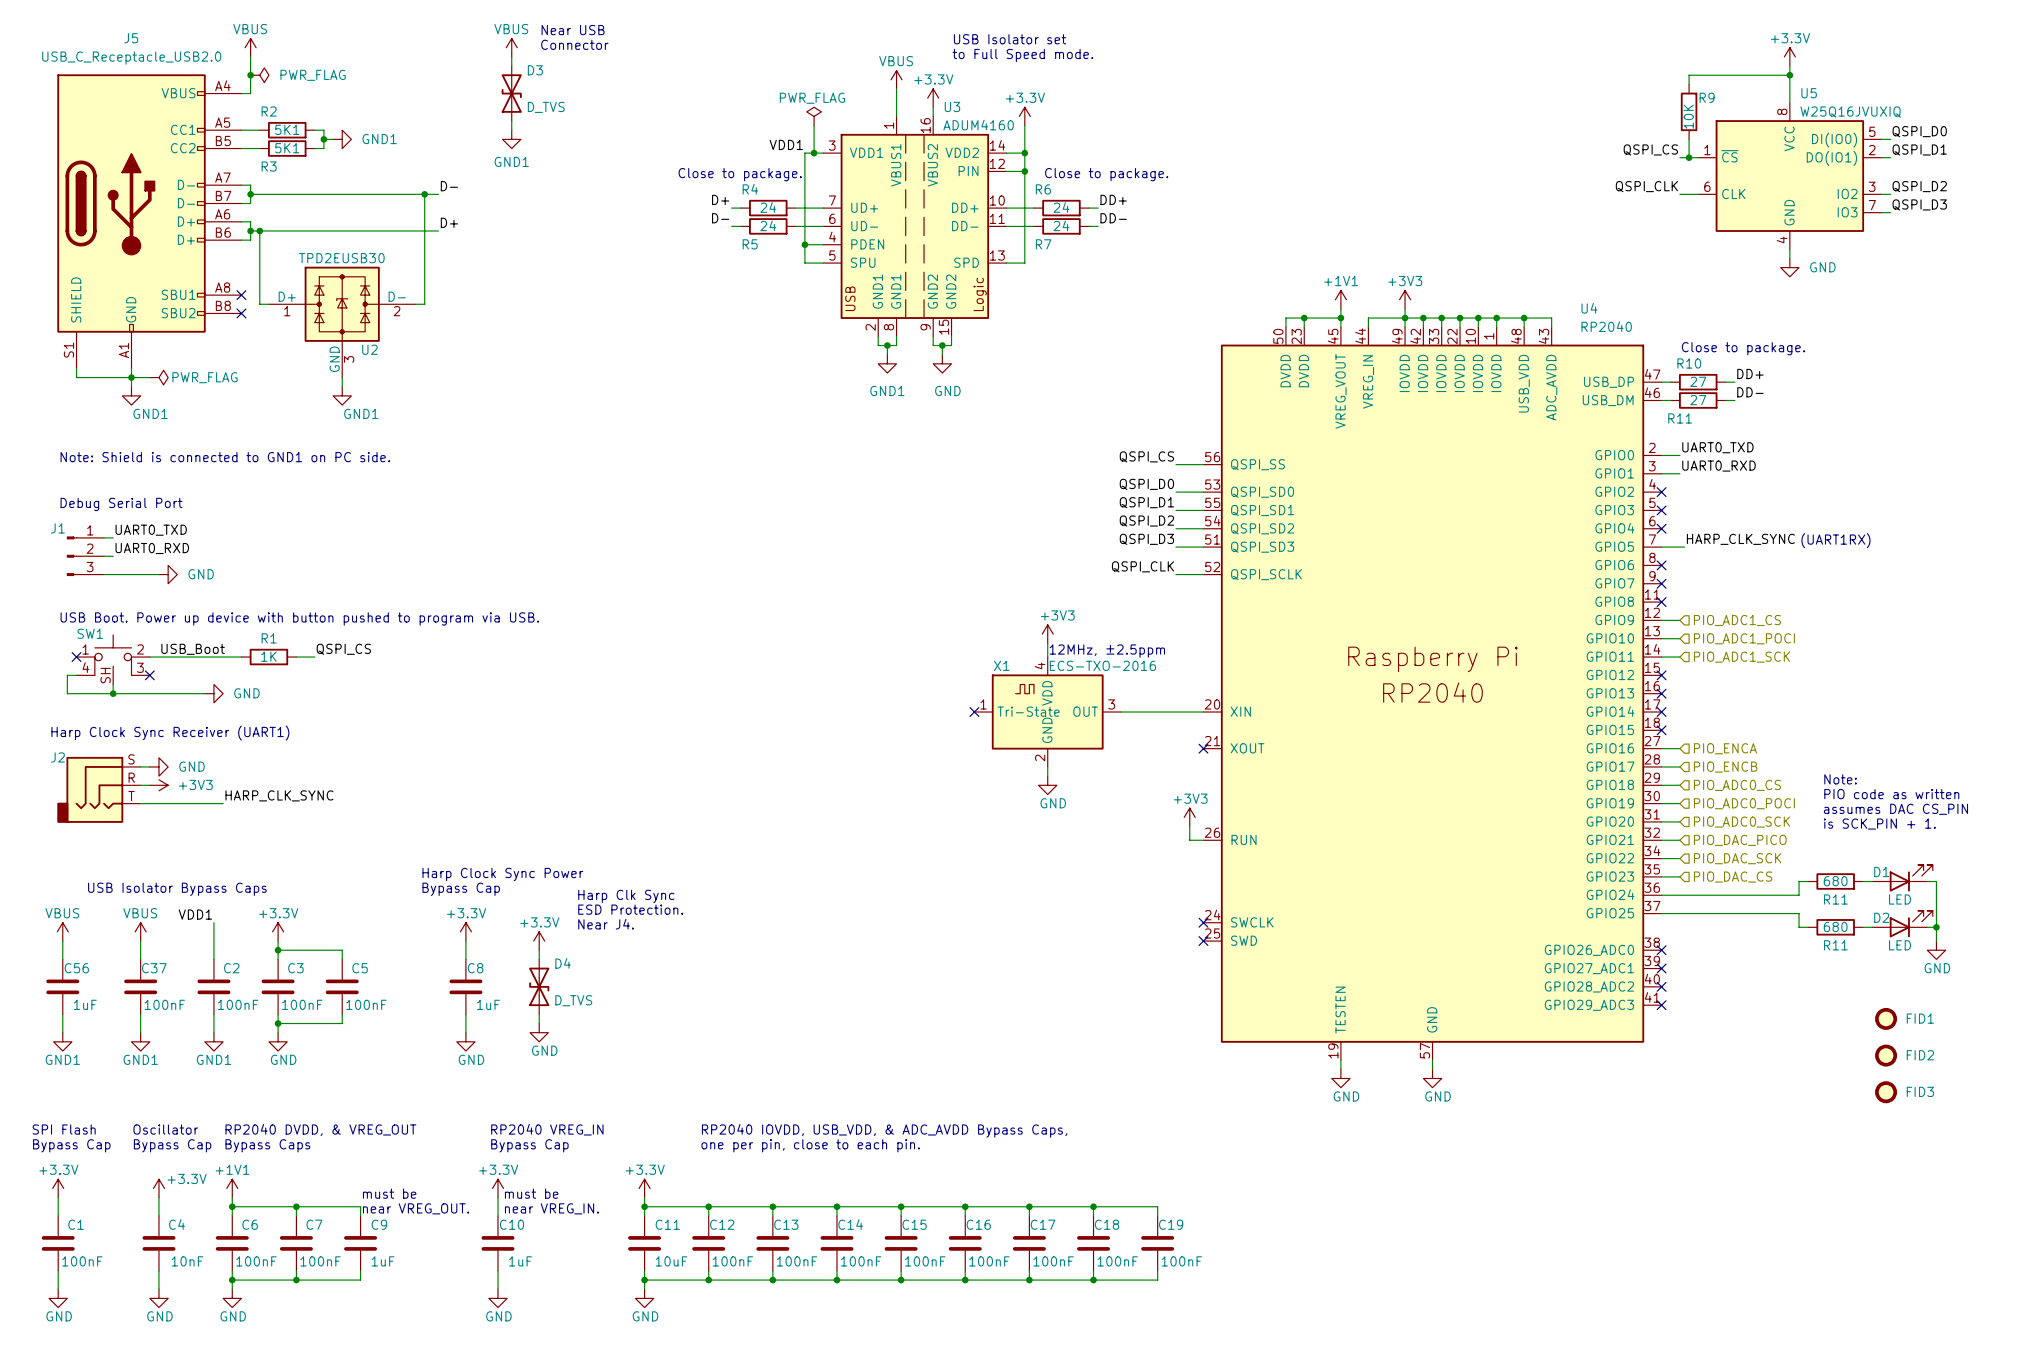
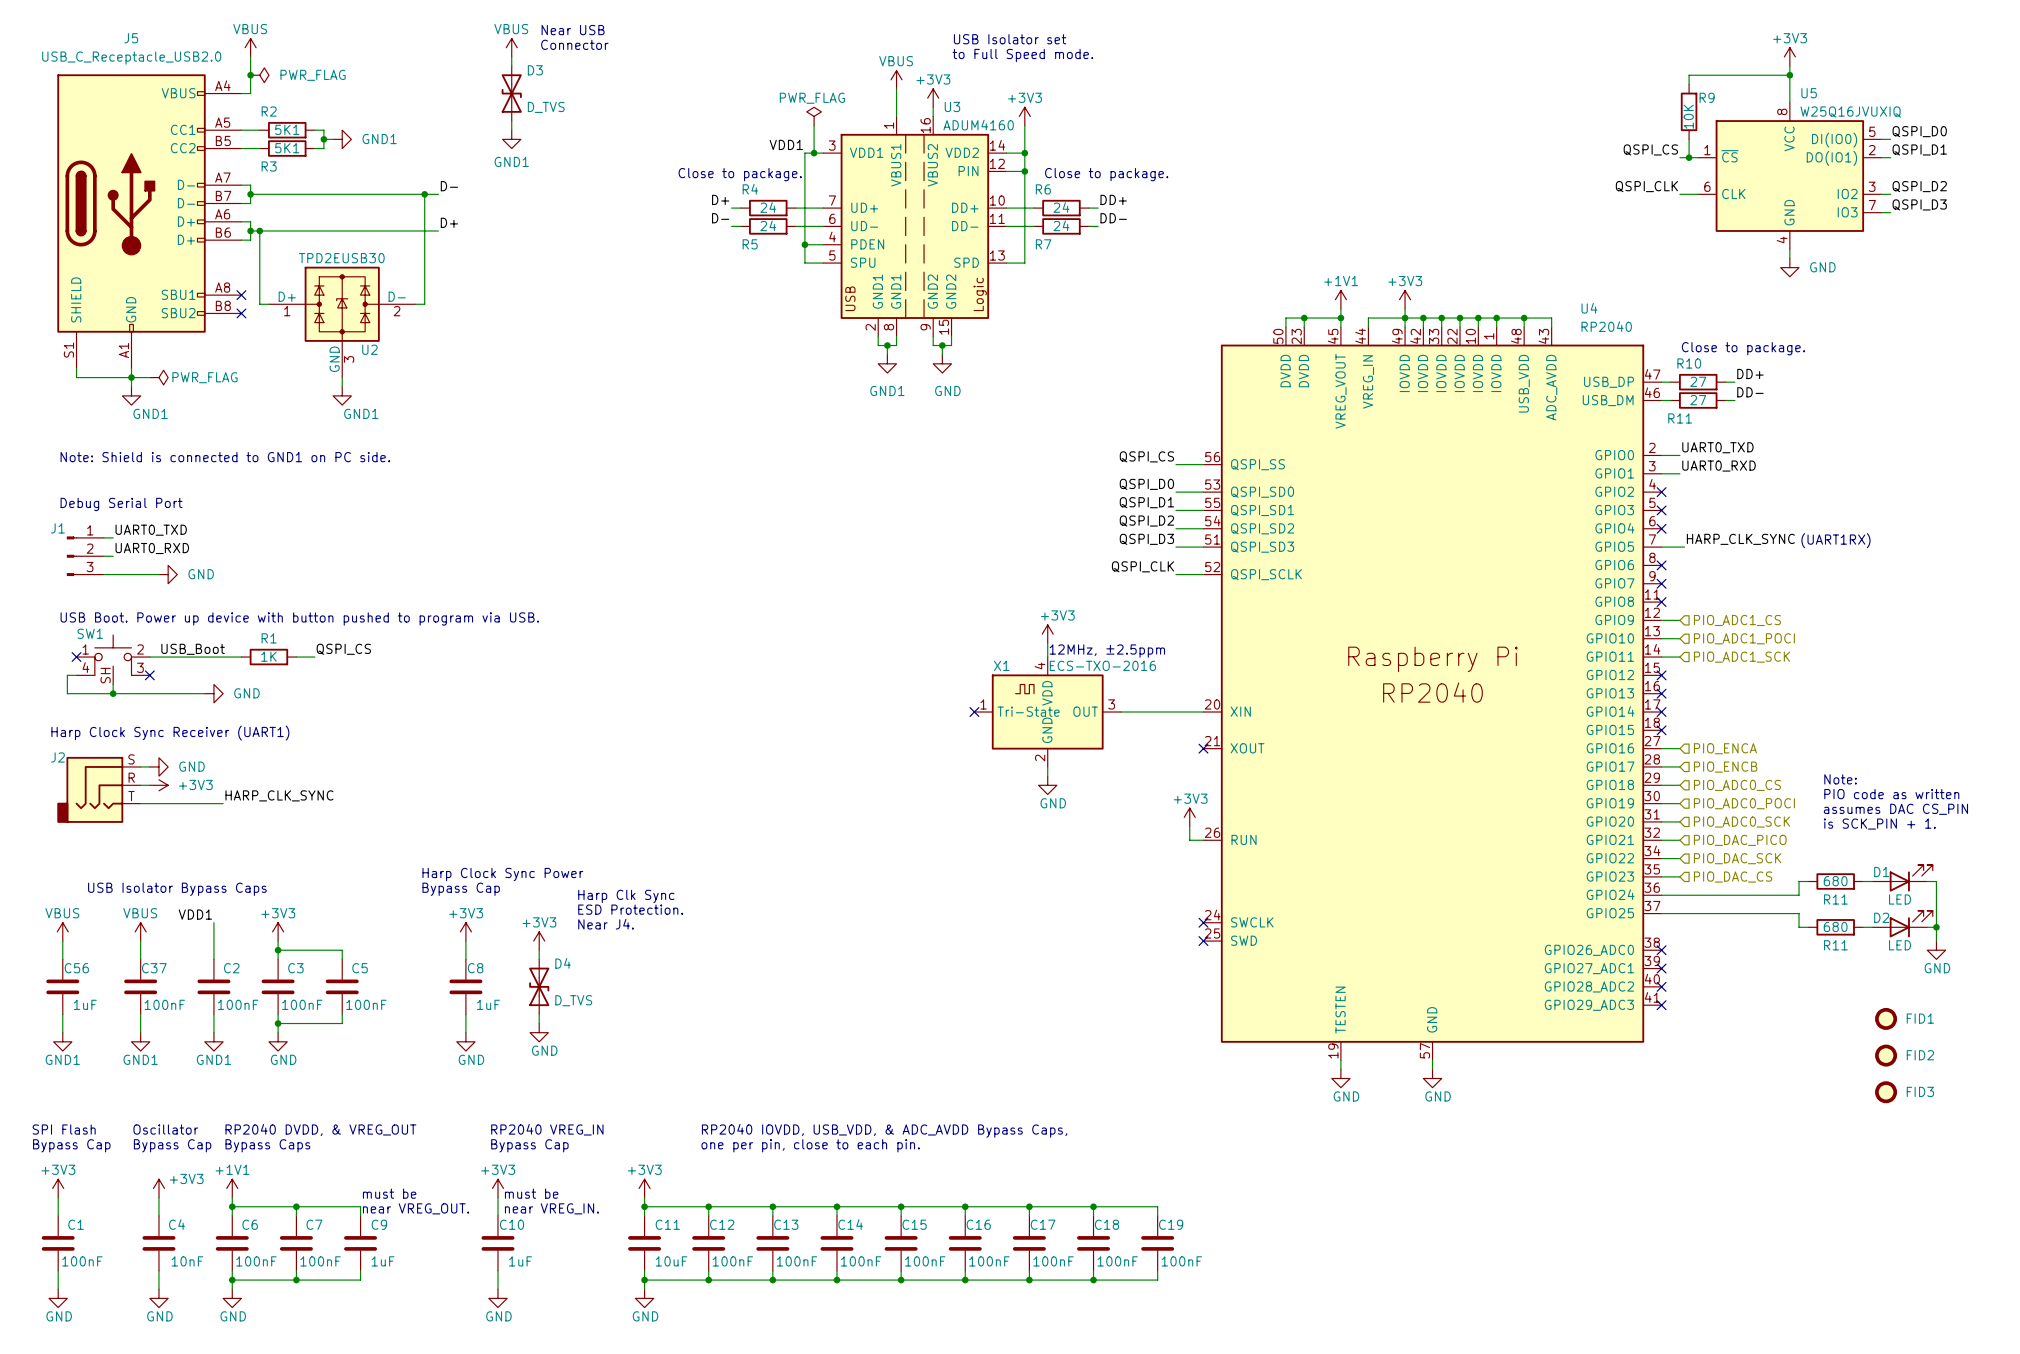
power symbol: +3.3V (1789, 56) -> +3V3 (1789, 56)
power symbol: +3.3V (933, 98) -> +3V3 (933, 98)
power symbol: +3.3V (1024, 116) -> +3V3 (1024, 116)
power symbol: +3.3V (278, 931) -> +3V3 (278, 931)
power symbol: +3.3V (465, 931) -> +3V3 (465, 931)
power symbol: +3.3V (539, 941) -> +3V3 (539, 941)
power symbol: +3.3V (58, 1188) -> +3V3 (58, 1188)
power symbol: +3.3V (158, 1188) -> +3V3 (158, 1188)
power symbol: +3.3V (497, 1188) -> +3V3 (497, 1188)
power symbol: +3.3V (644, 1188) -> +3V3 (644, 1188)

